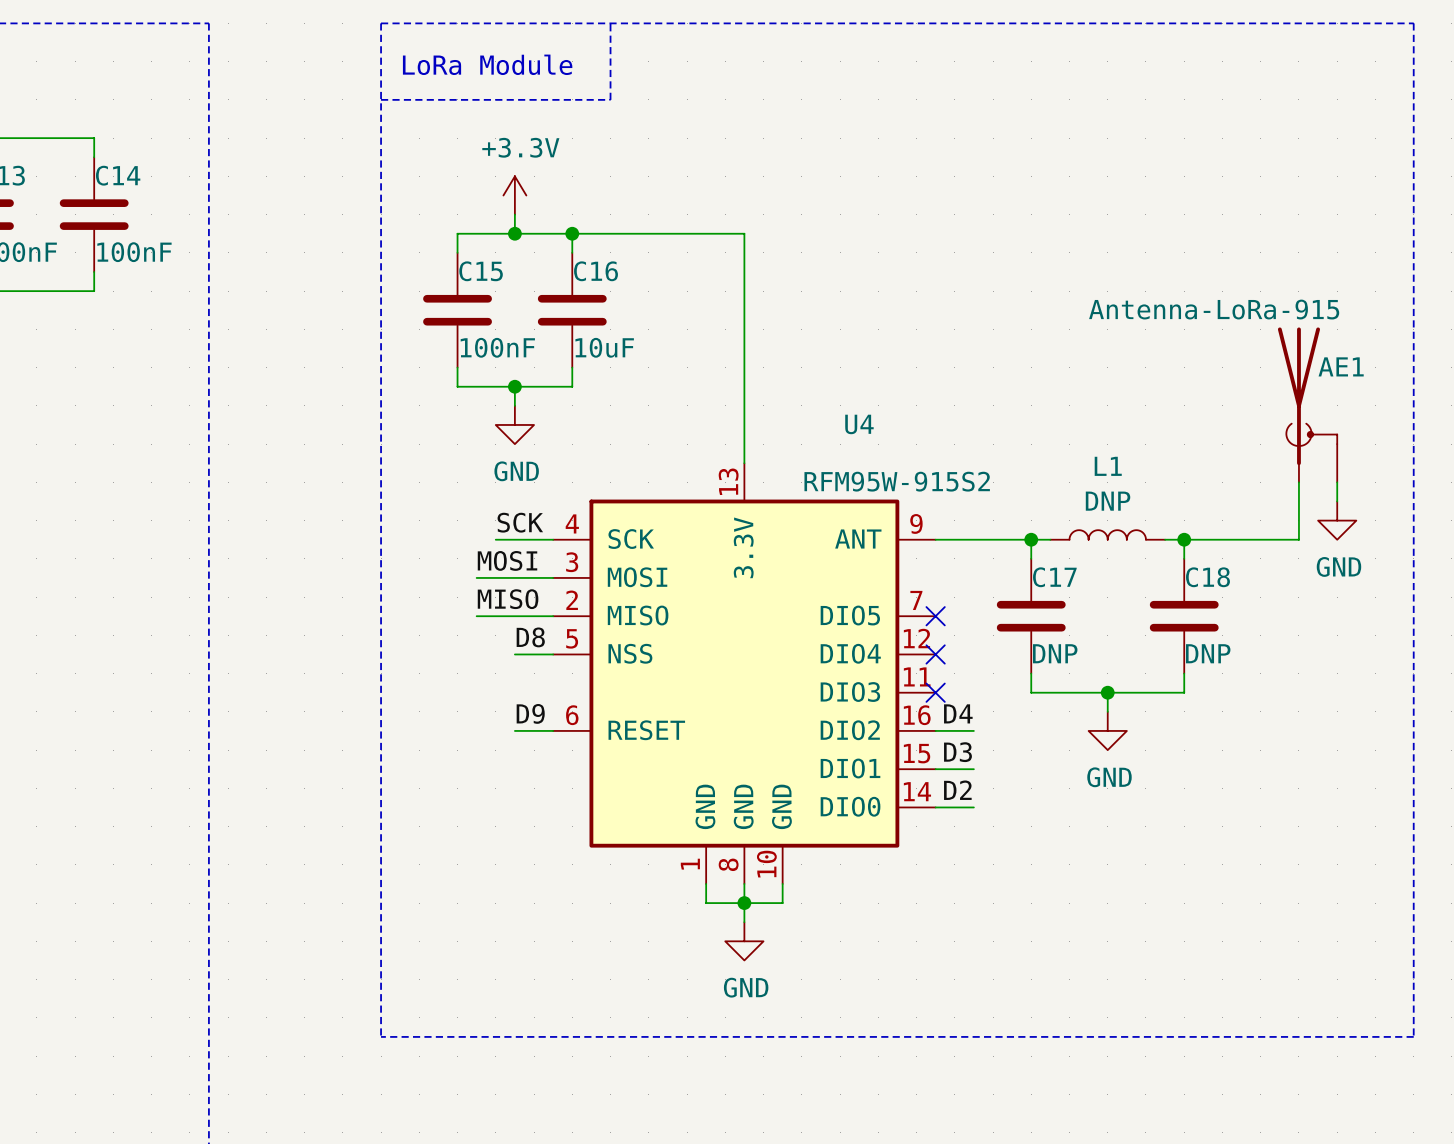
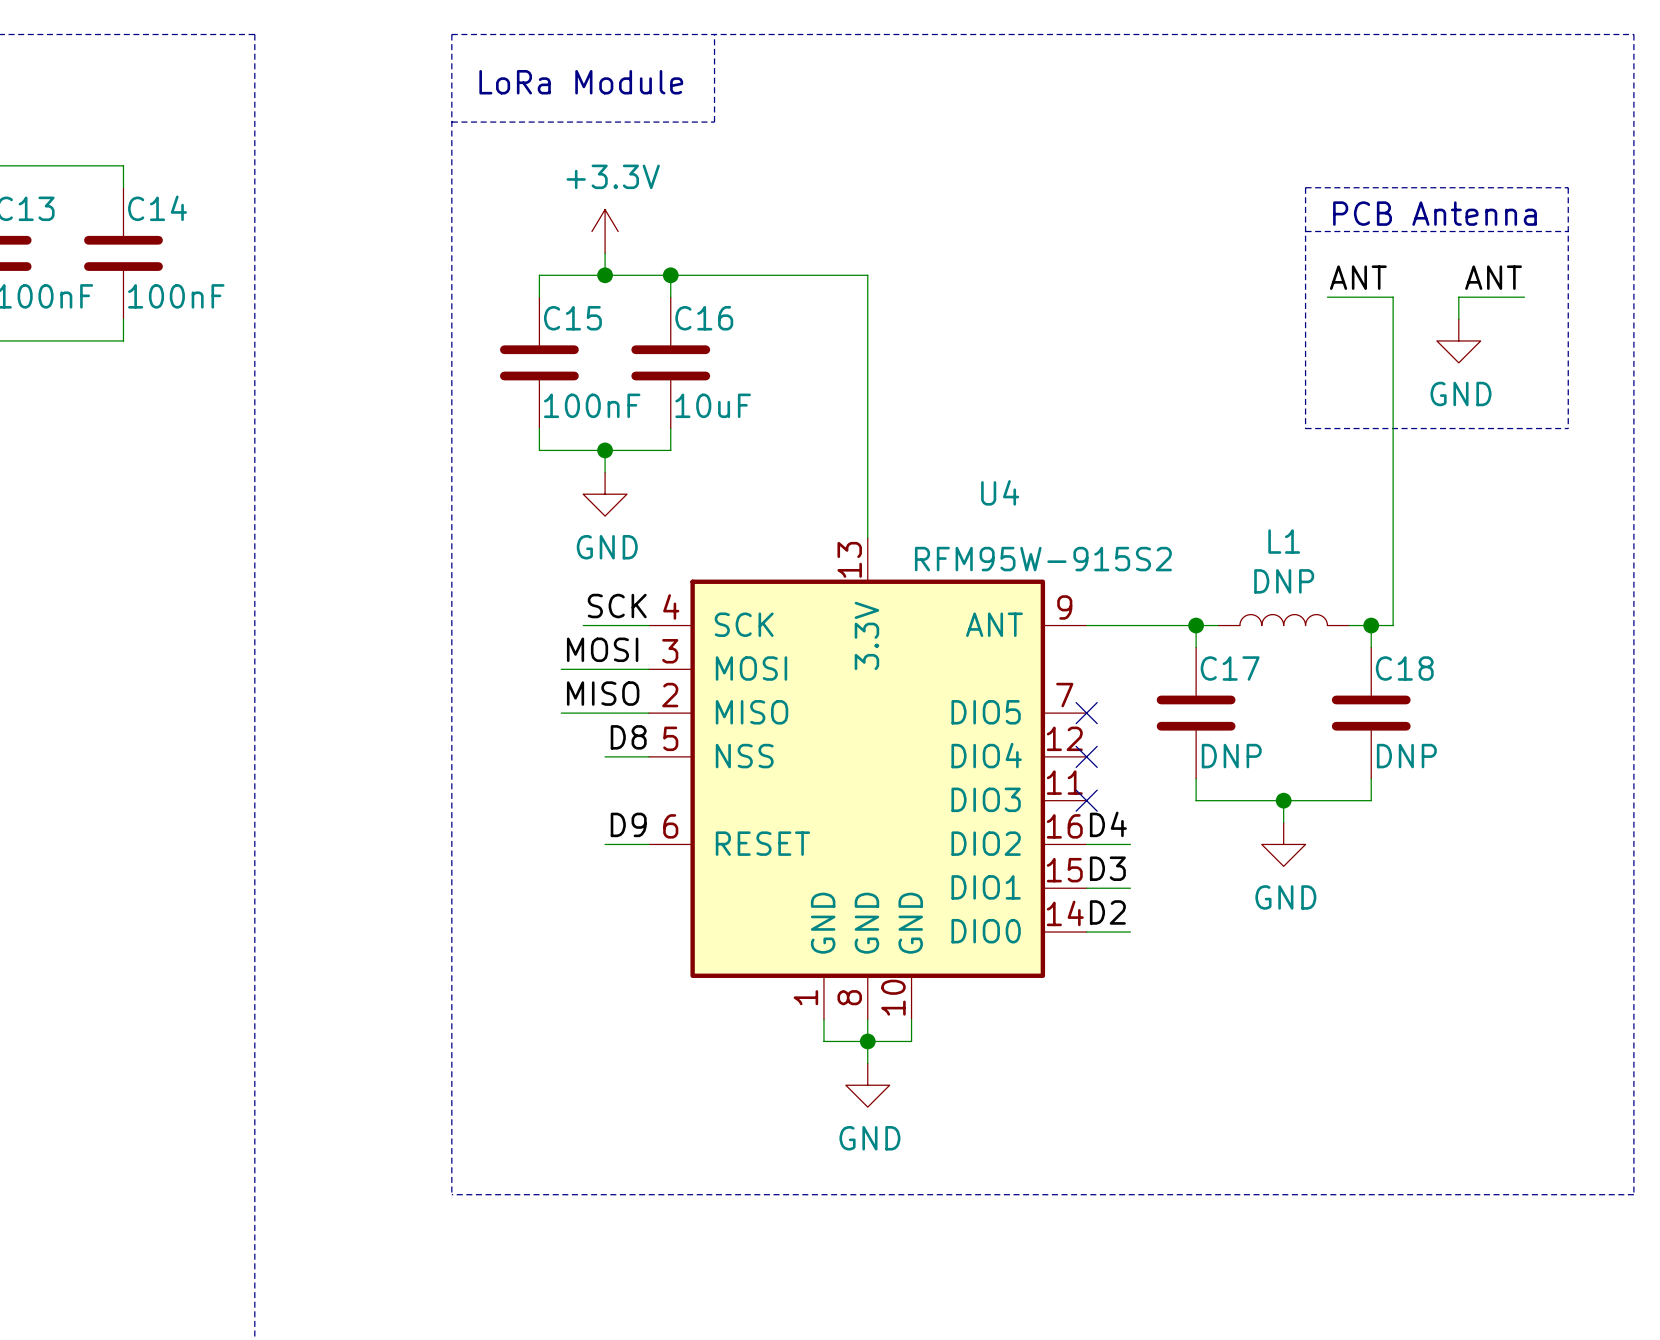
line: none -> (1305, 187) (1305, 428) (1568, 428) (1568, 187) (1305, 187)
text: none -> PCB Antenna (1434, 213)
line: none -> (1305, 231) (1568, 231)
label: none -> ANT (1358, 277)
label: none -> ANT (1493, 277)
wire: none -> (1524, 297) (1458, 297) (1458, 319)
AE1: Antenna-LoRa-915 (1307, 404) -> none
wire: (1298, 482) (1298, 539) (1203, 539) -> (1327, 297) (1393, 297) (1393, 625)
wire: (1337, 482) (1337, 501) -> none
power symbol position: GND (1337, 520) -> GND (1458, 340)

